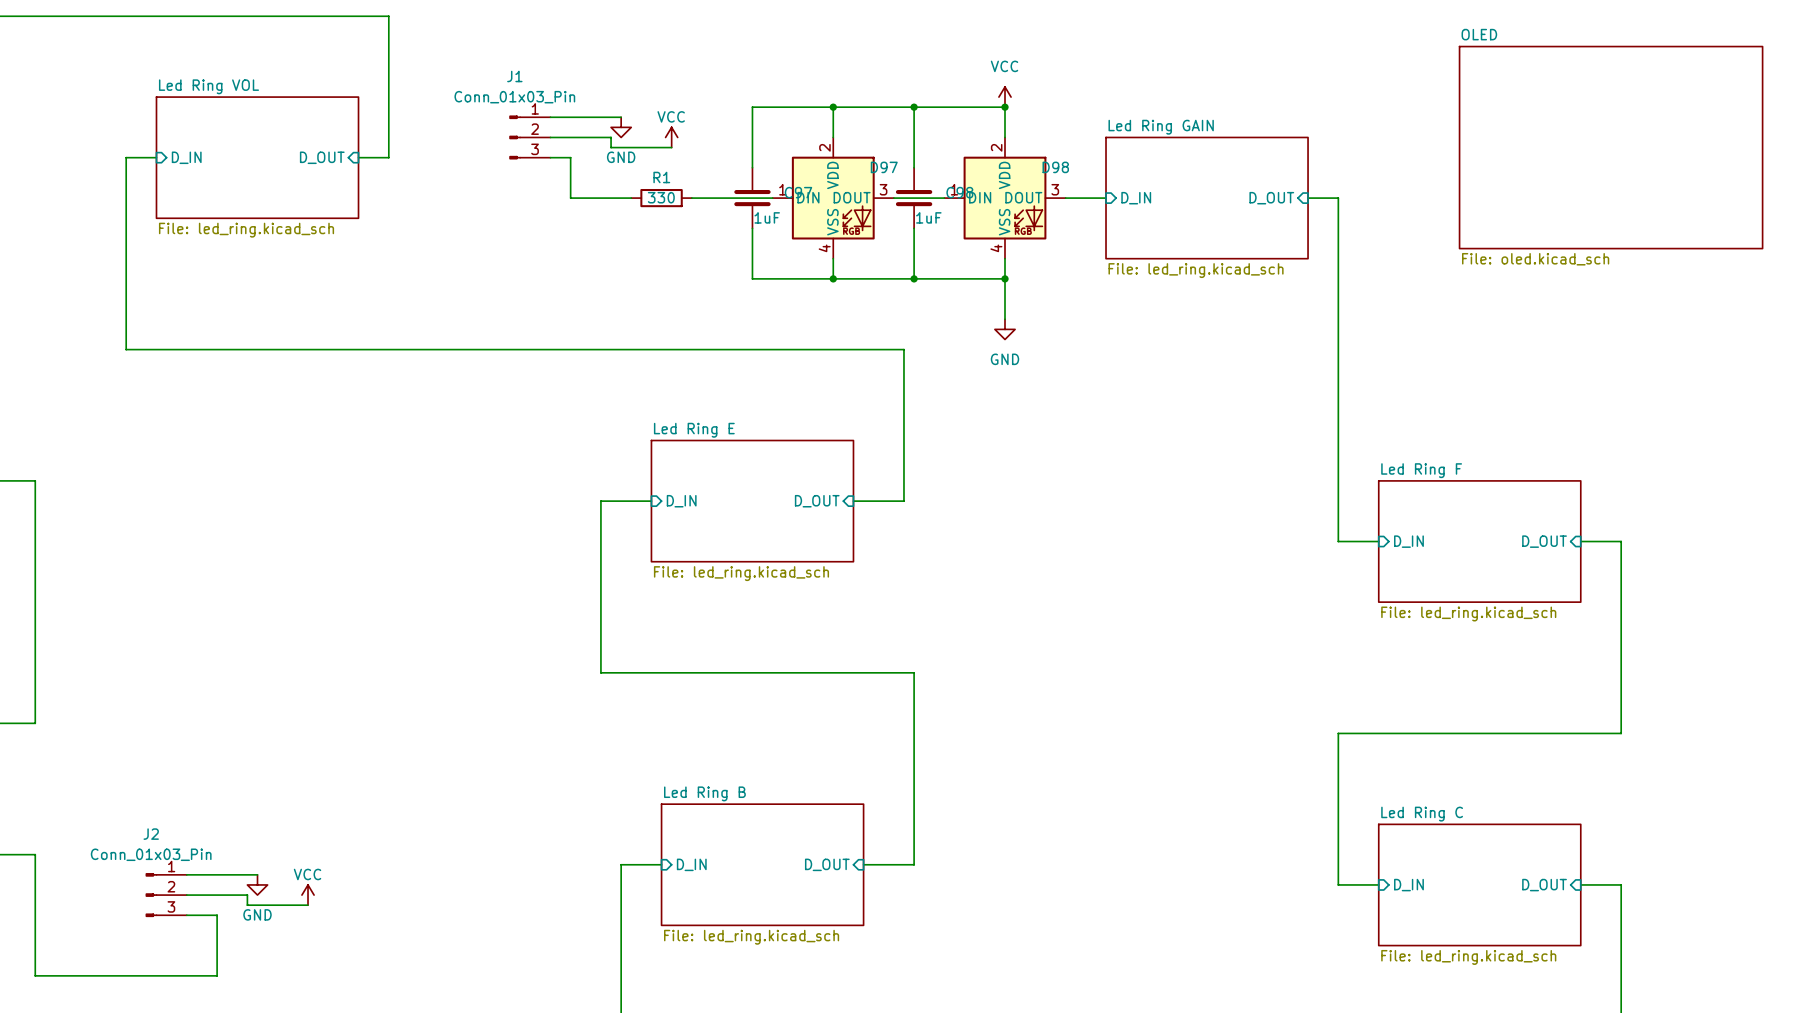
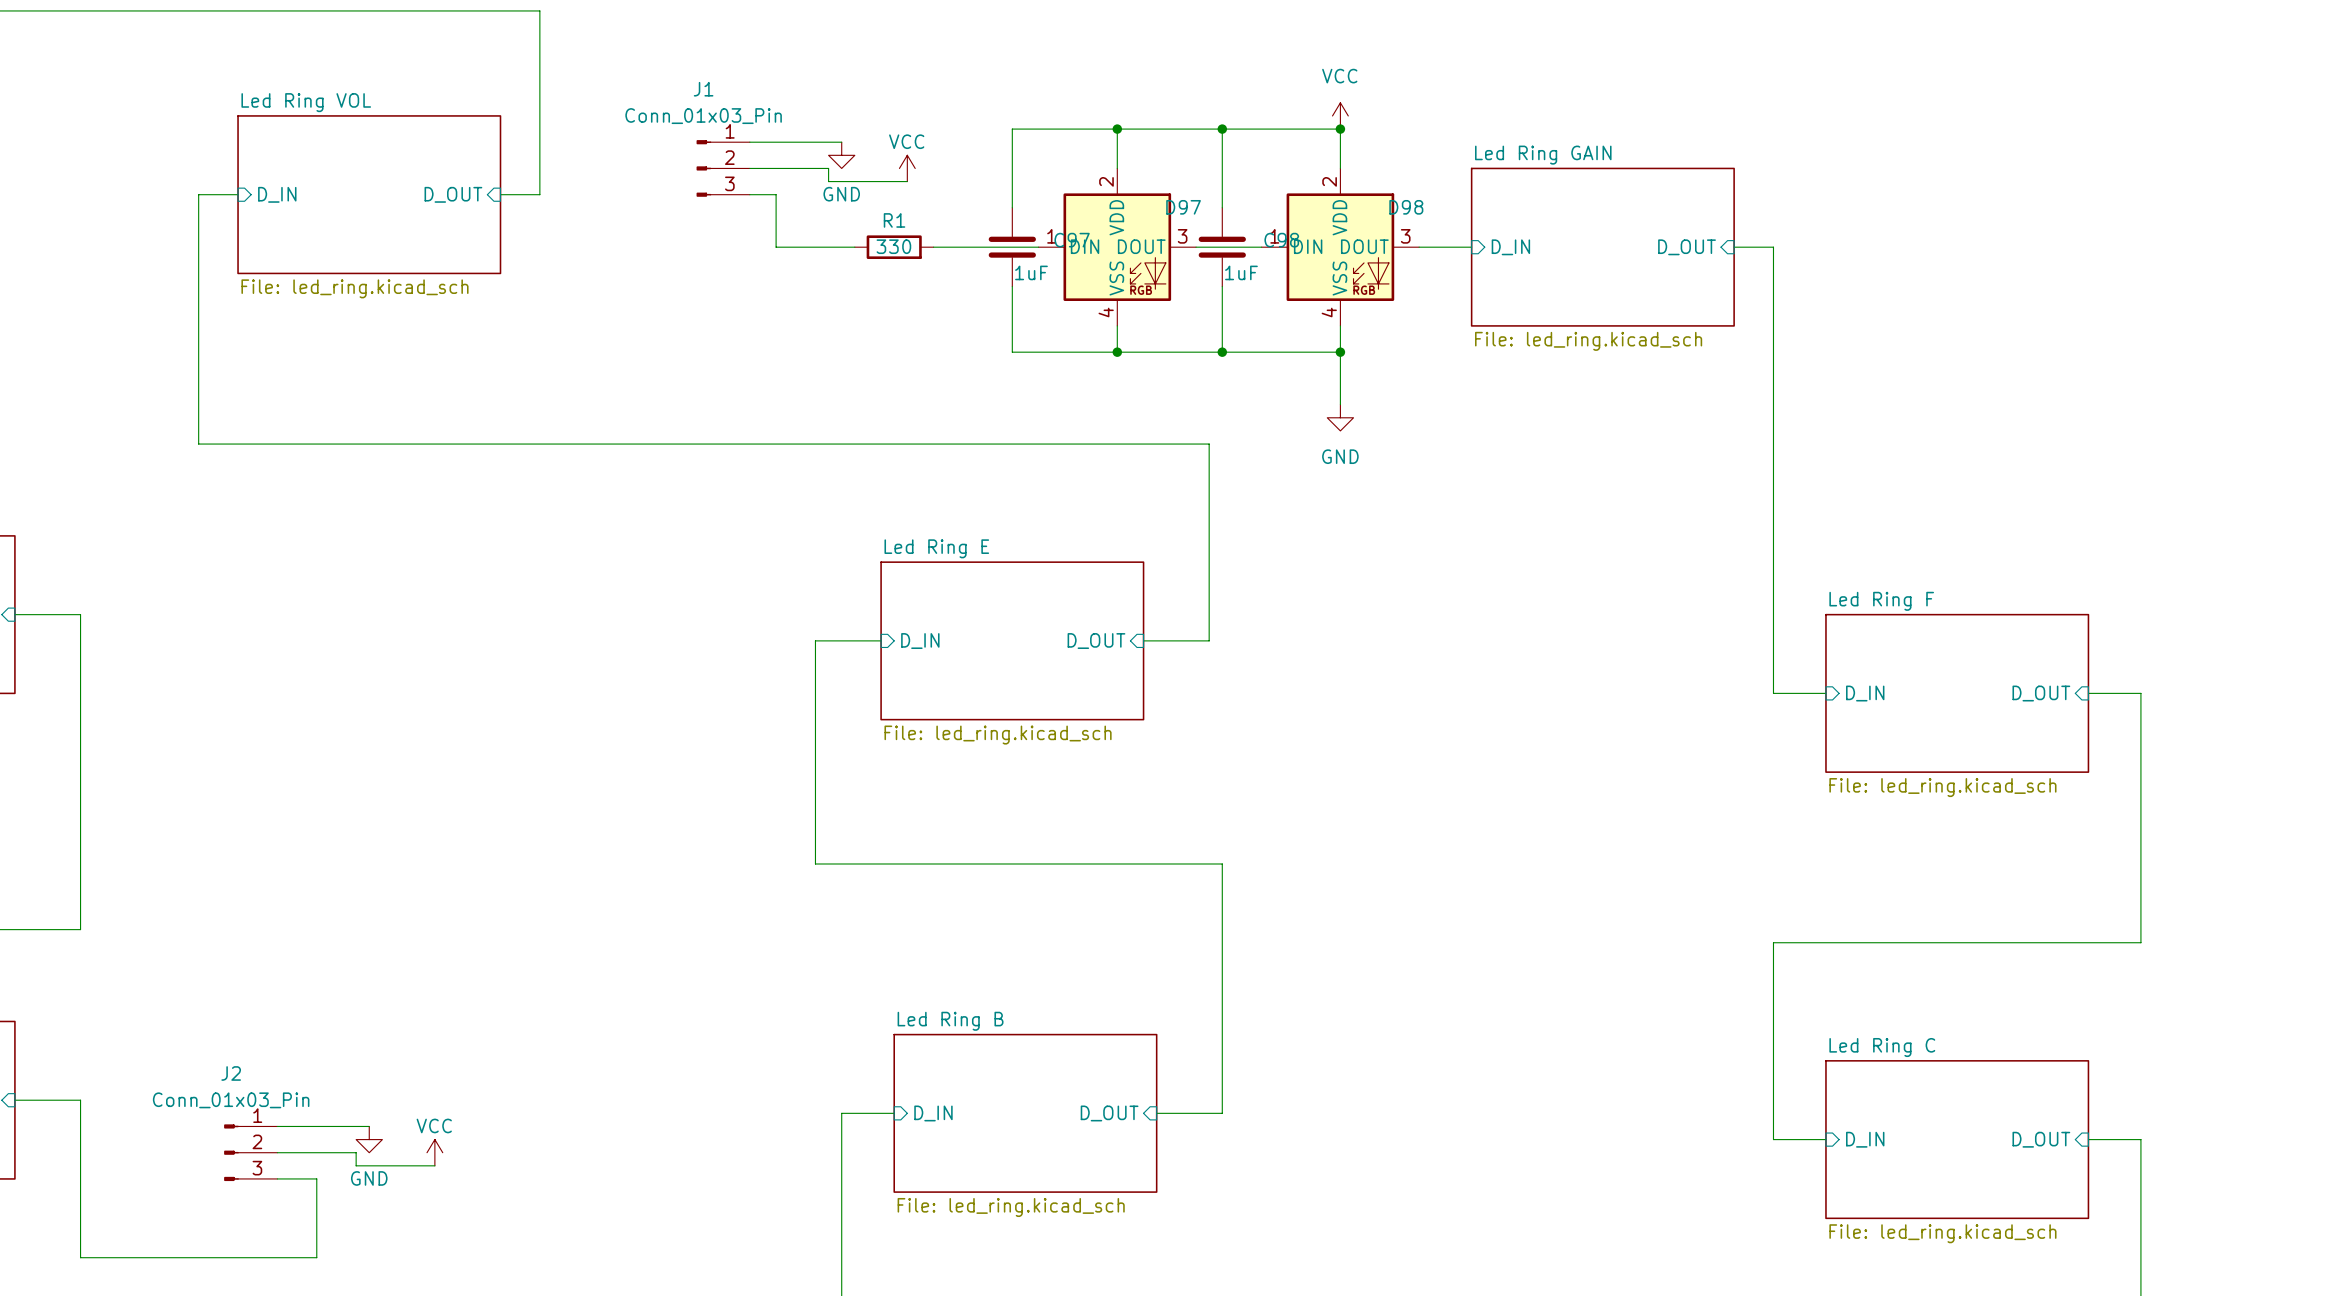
sheet OLED: File: oled.kicad_sch (1611, 147) -> none

